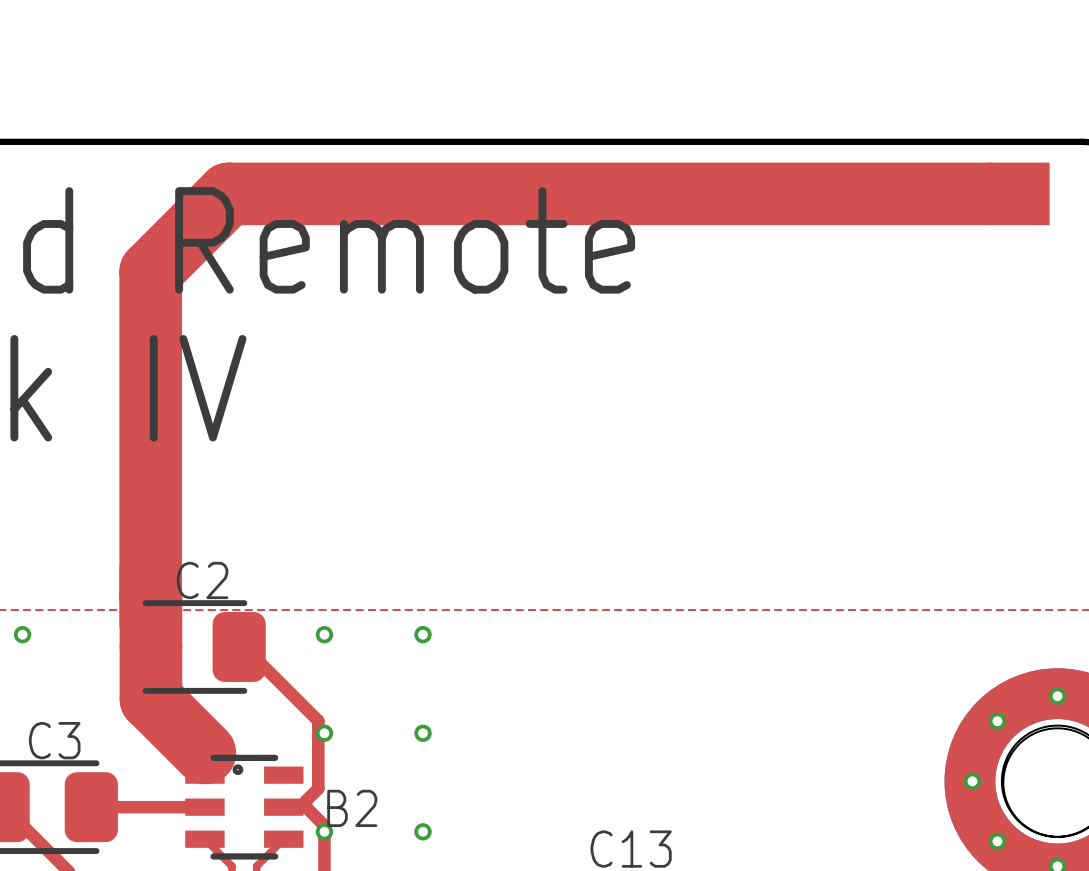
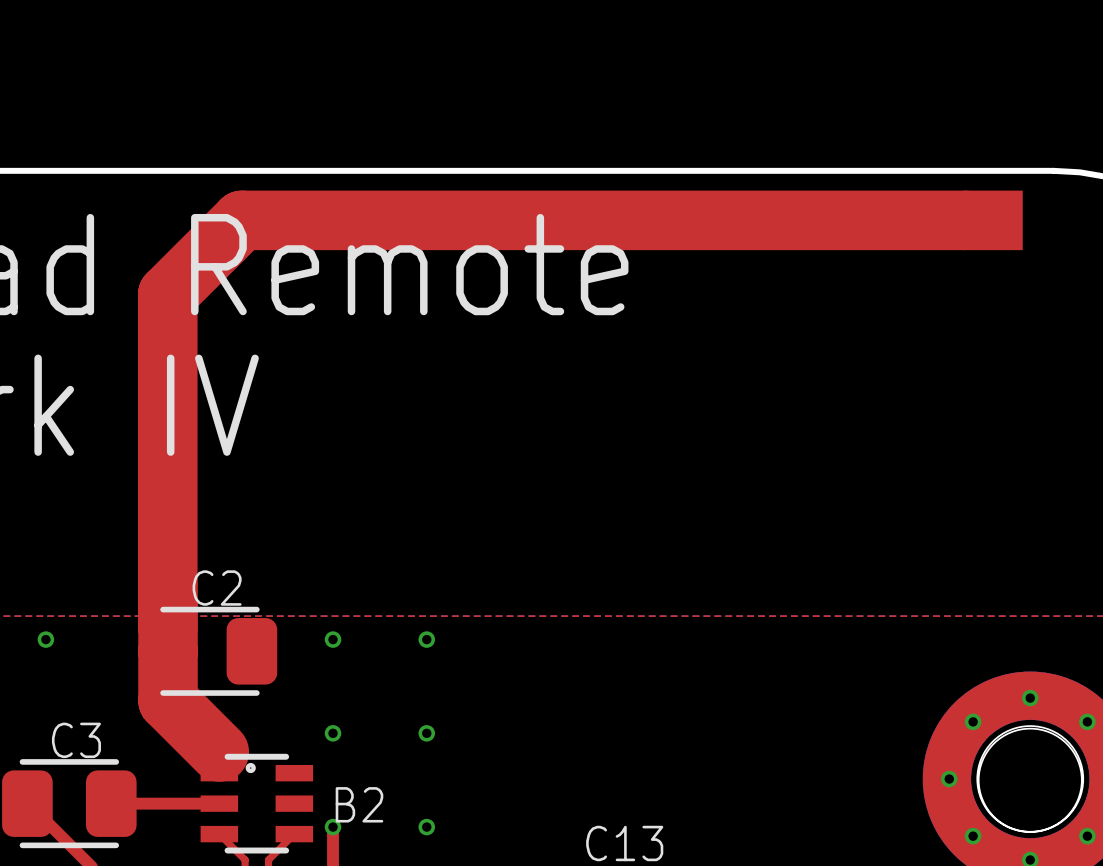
top track: (239, 647) (244, 647) (318, 720) (318, 788) (305, 801) (305, 807) -> none
top track: (305, 807) (324, 825) (324, 831) -> none

